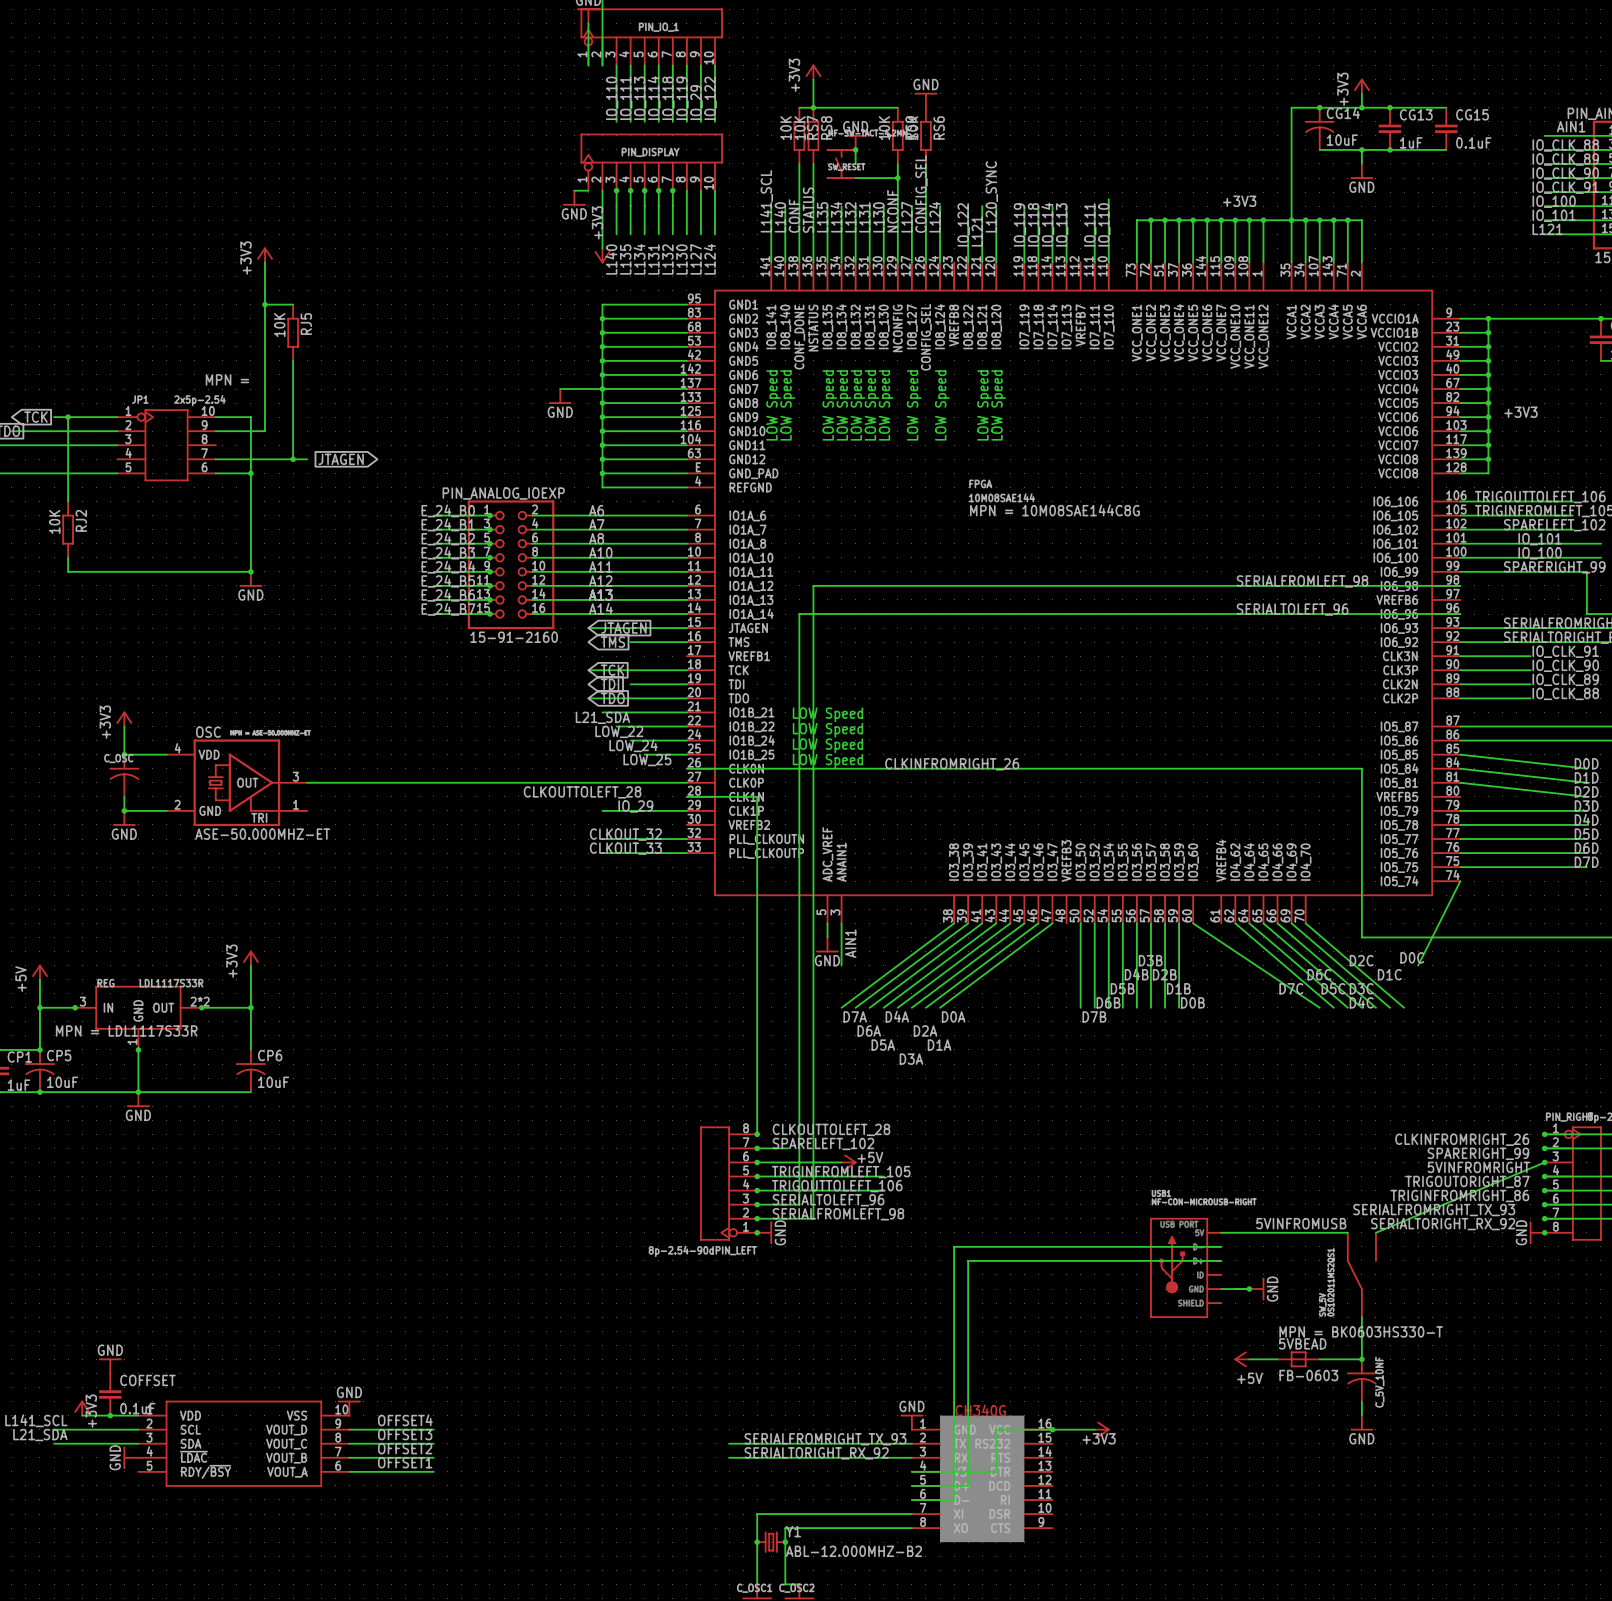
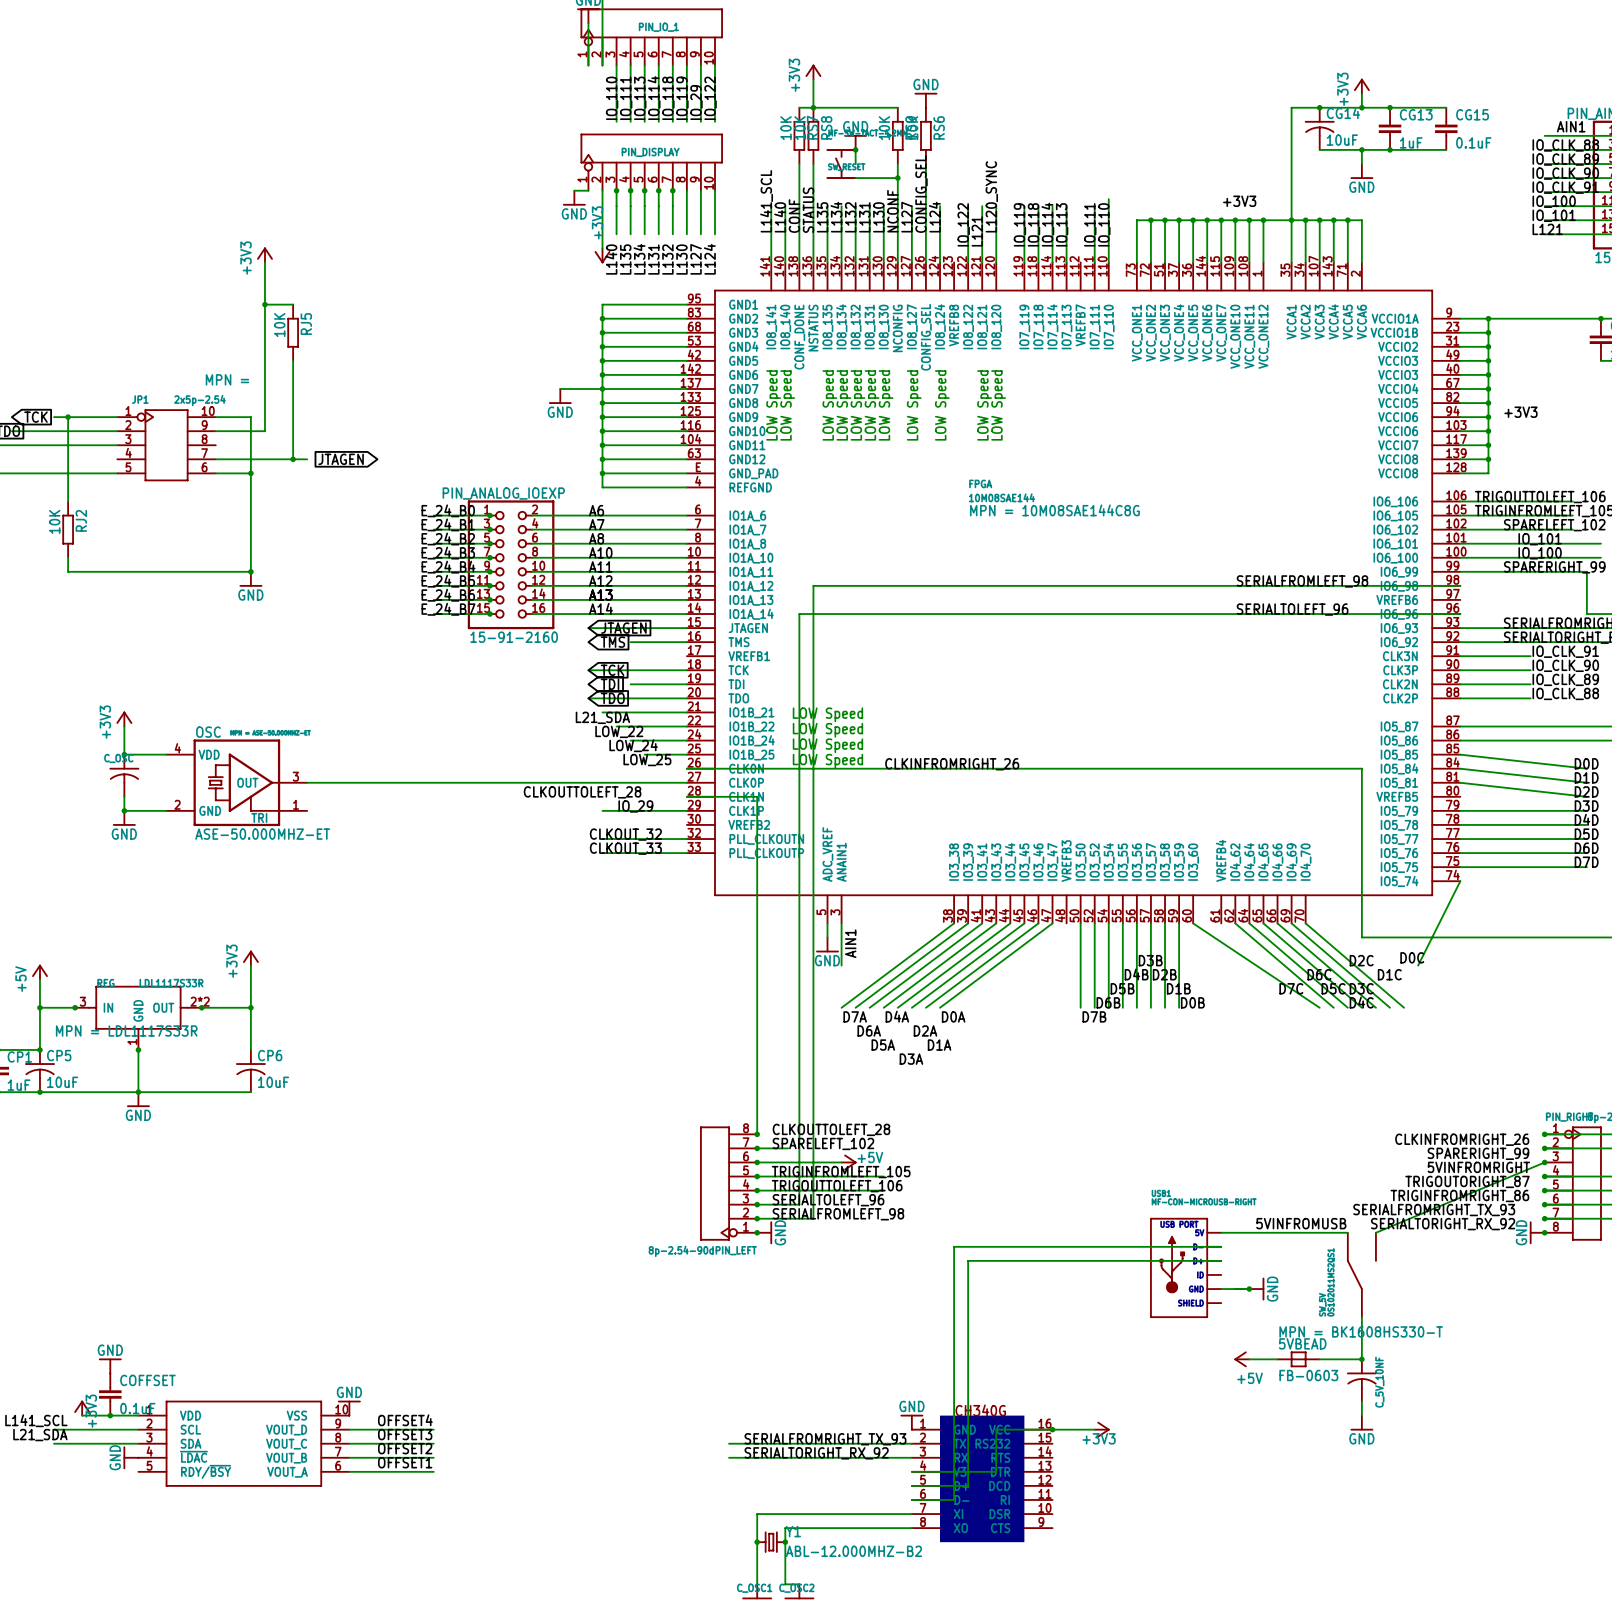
5VBEAD text: MPN = BK0603HS330-T (1361, 1331) -> MPN = BK1608HS330-T (1361, 1331)

